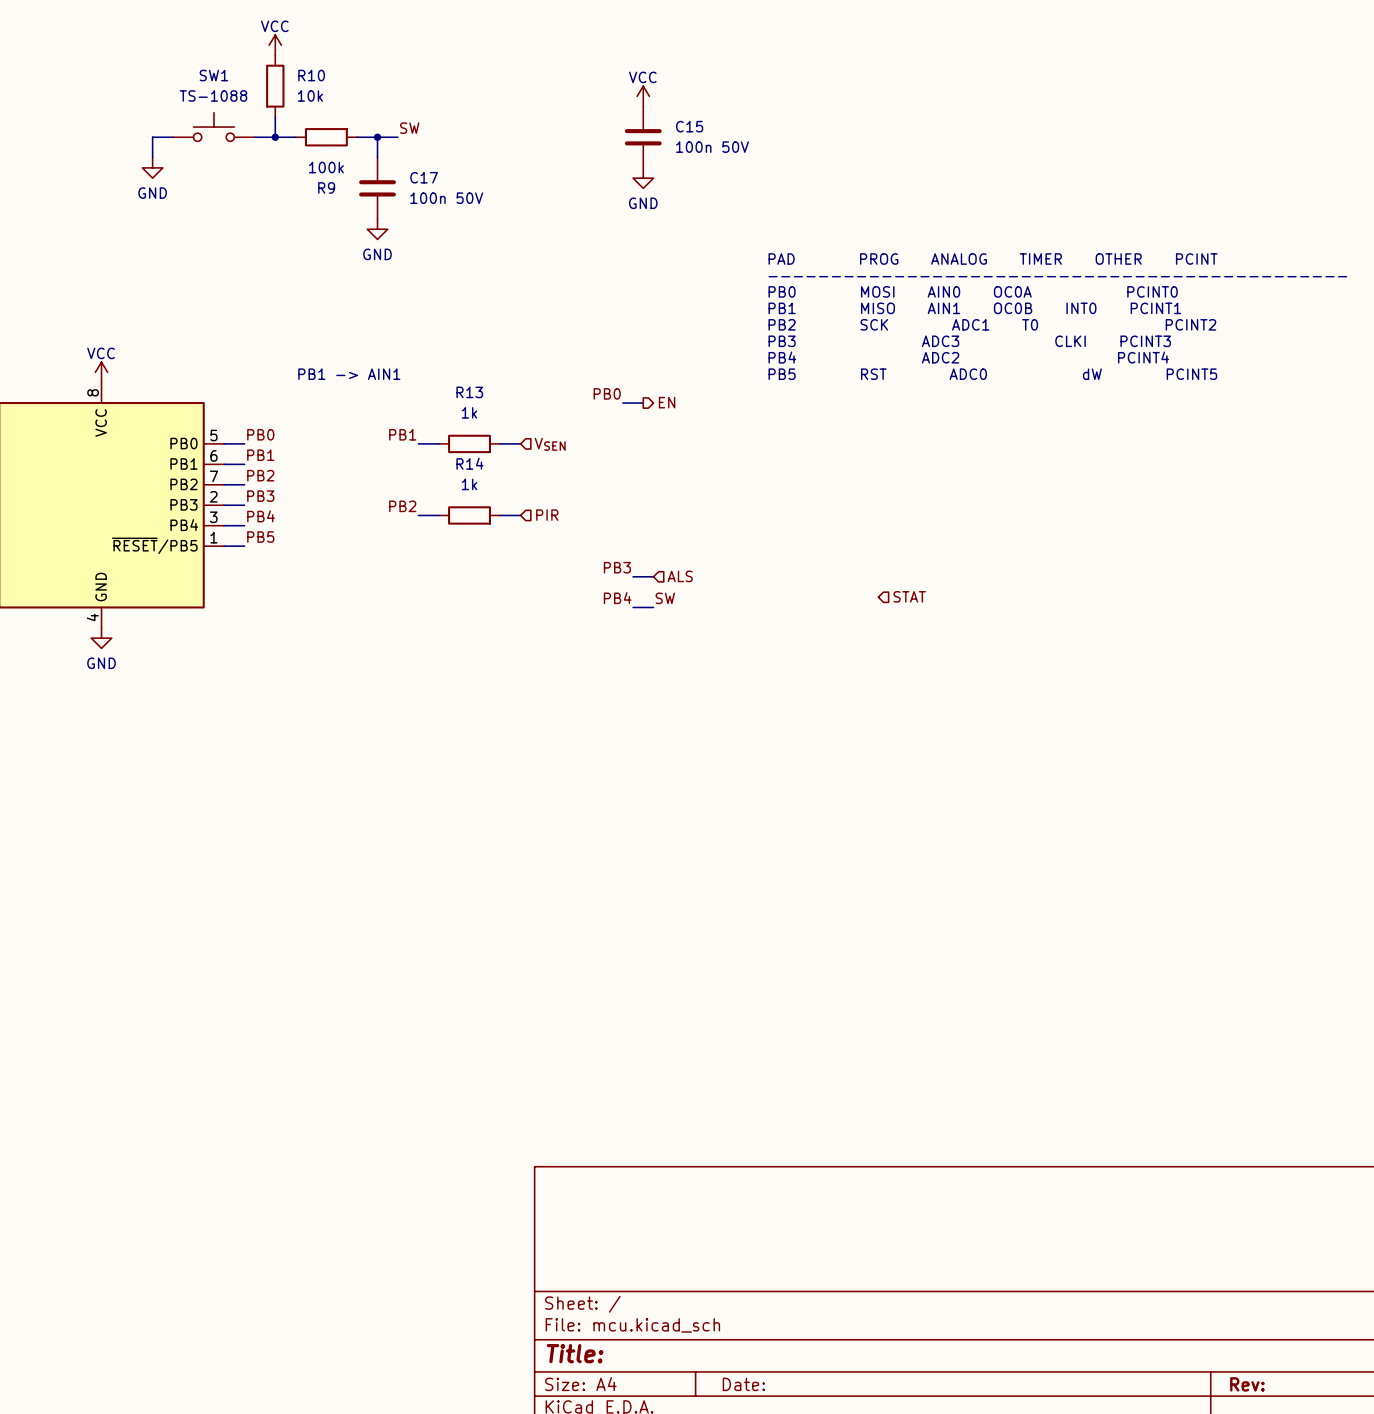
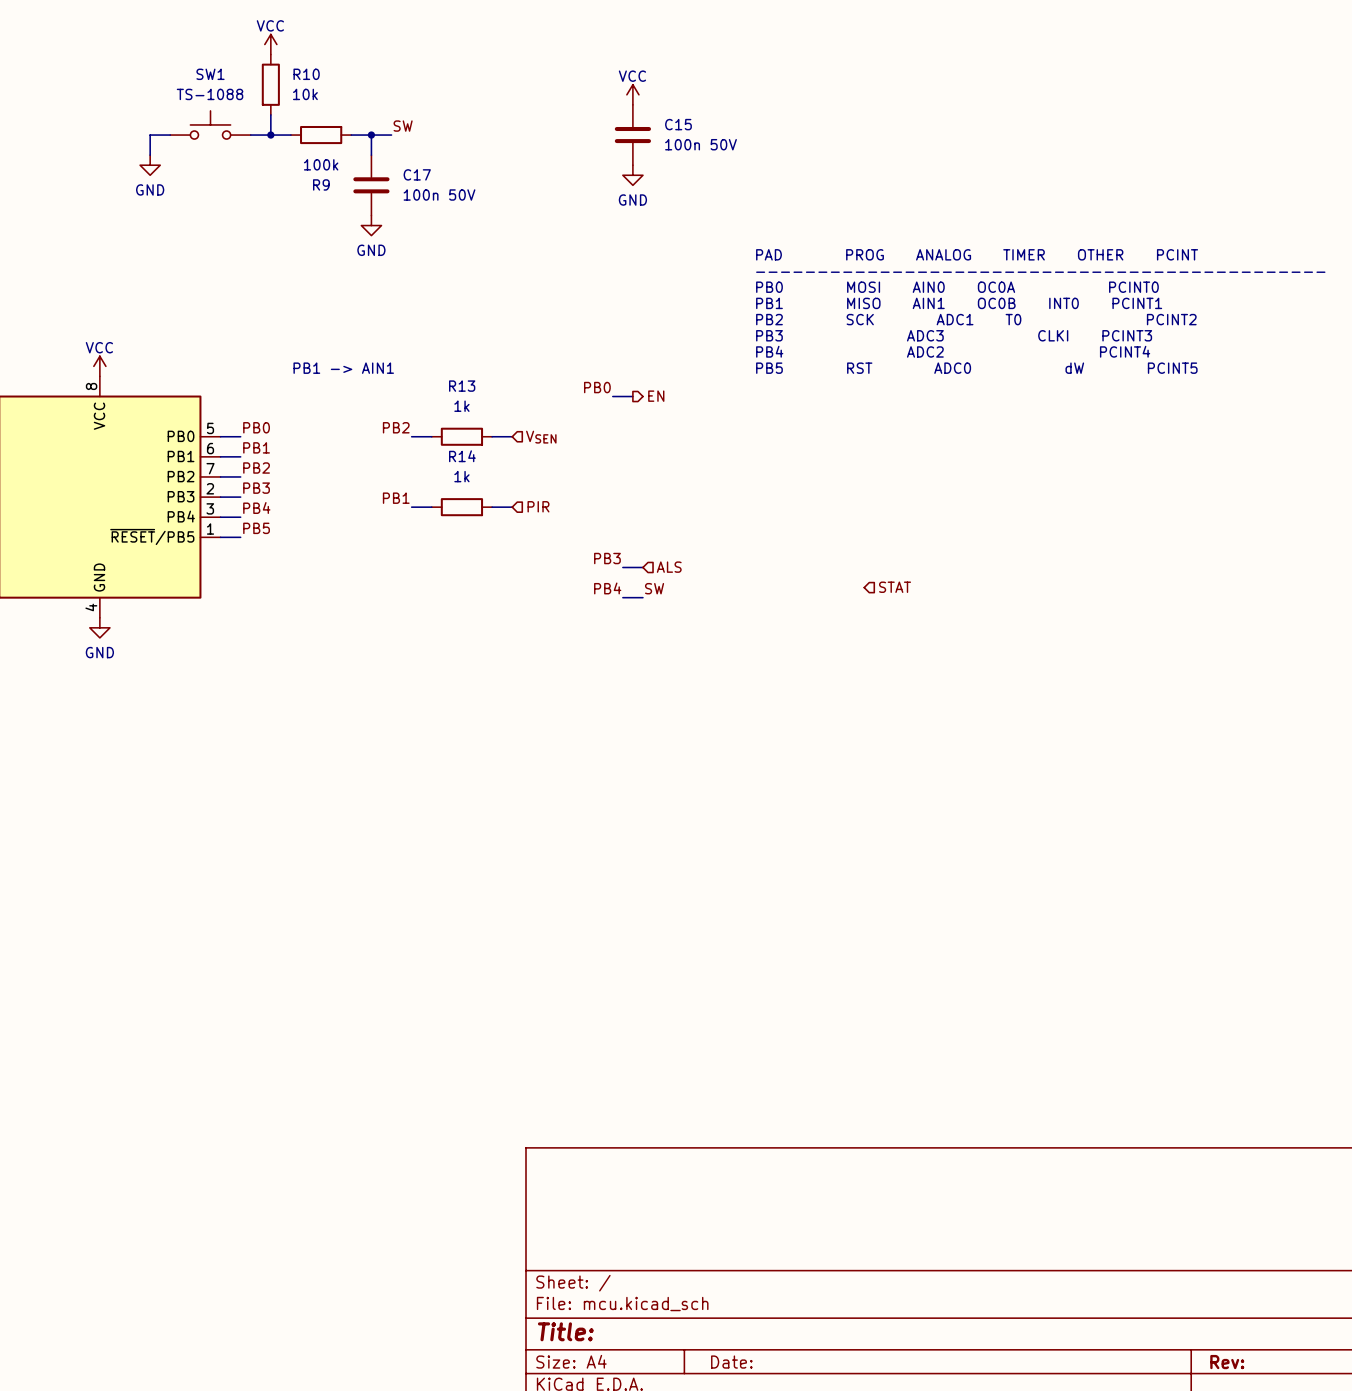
label: PB1 (402, 434) -> PB2 (396, 427)
label: PB2 (402, 506) -> PB1 (396, 498)

